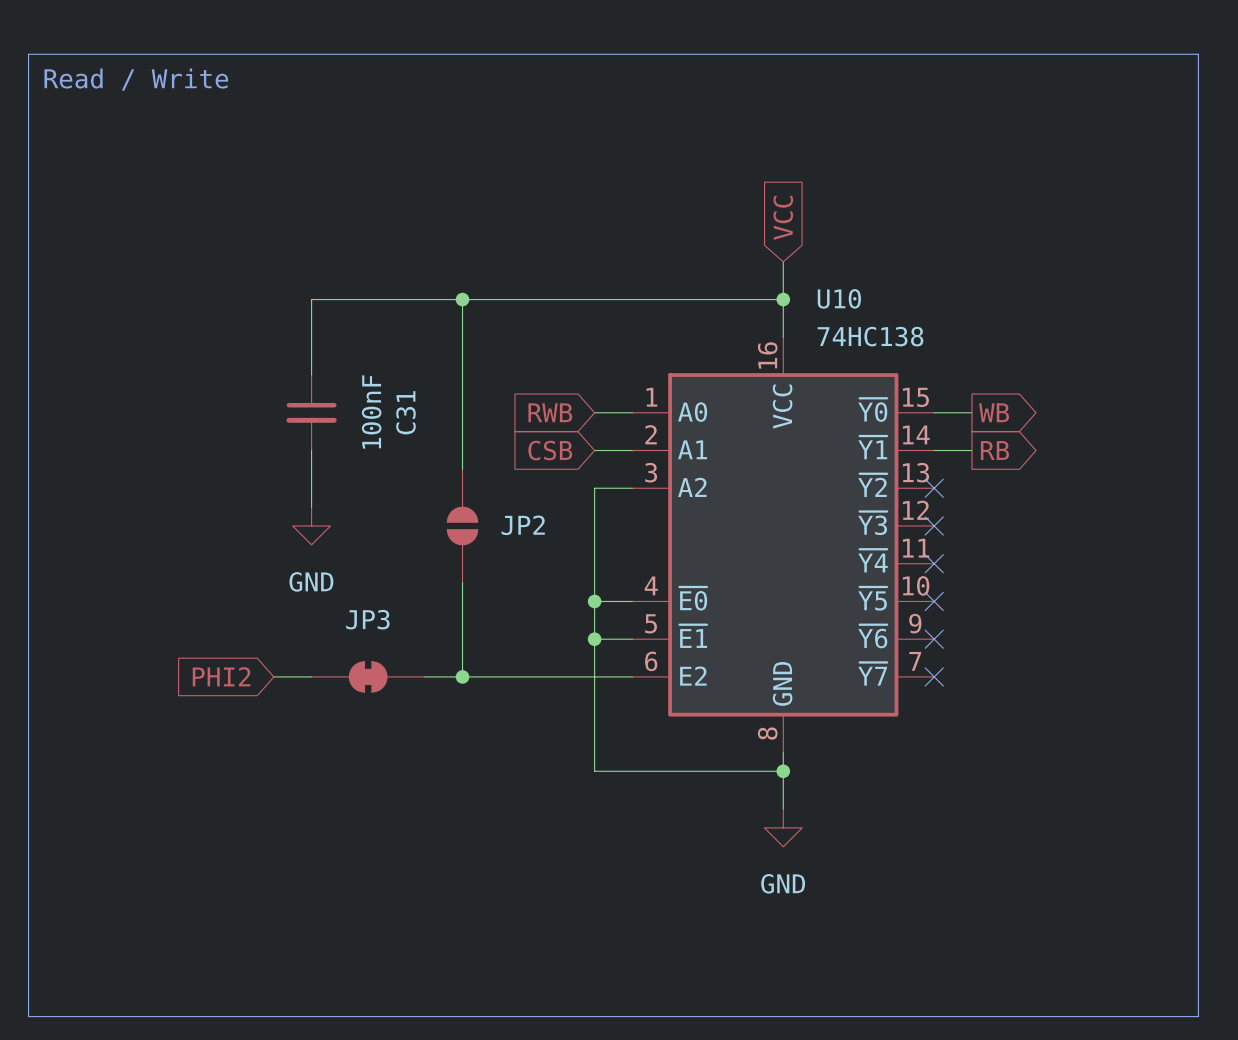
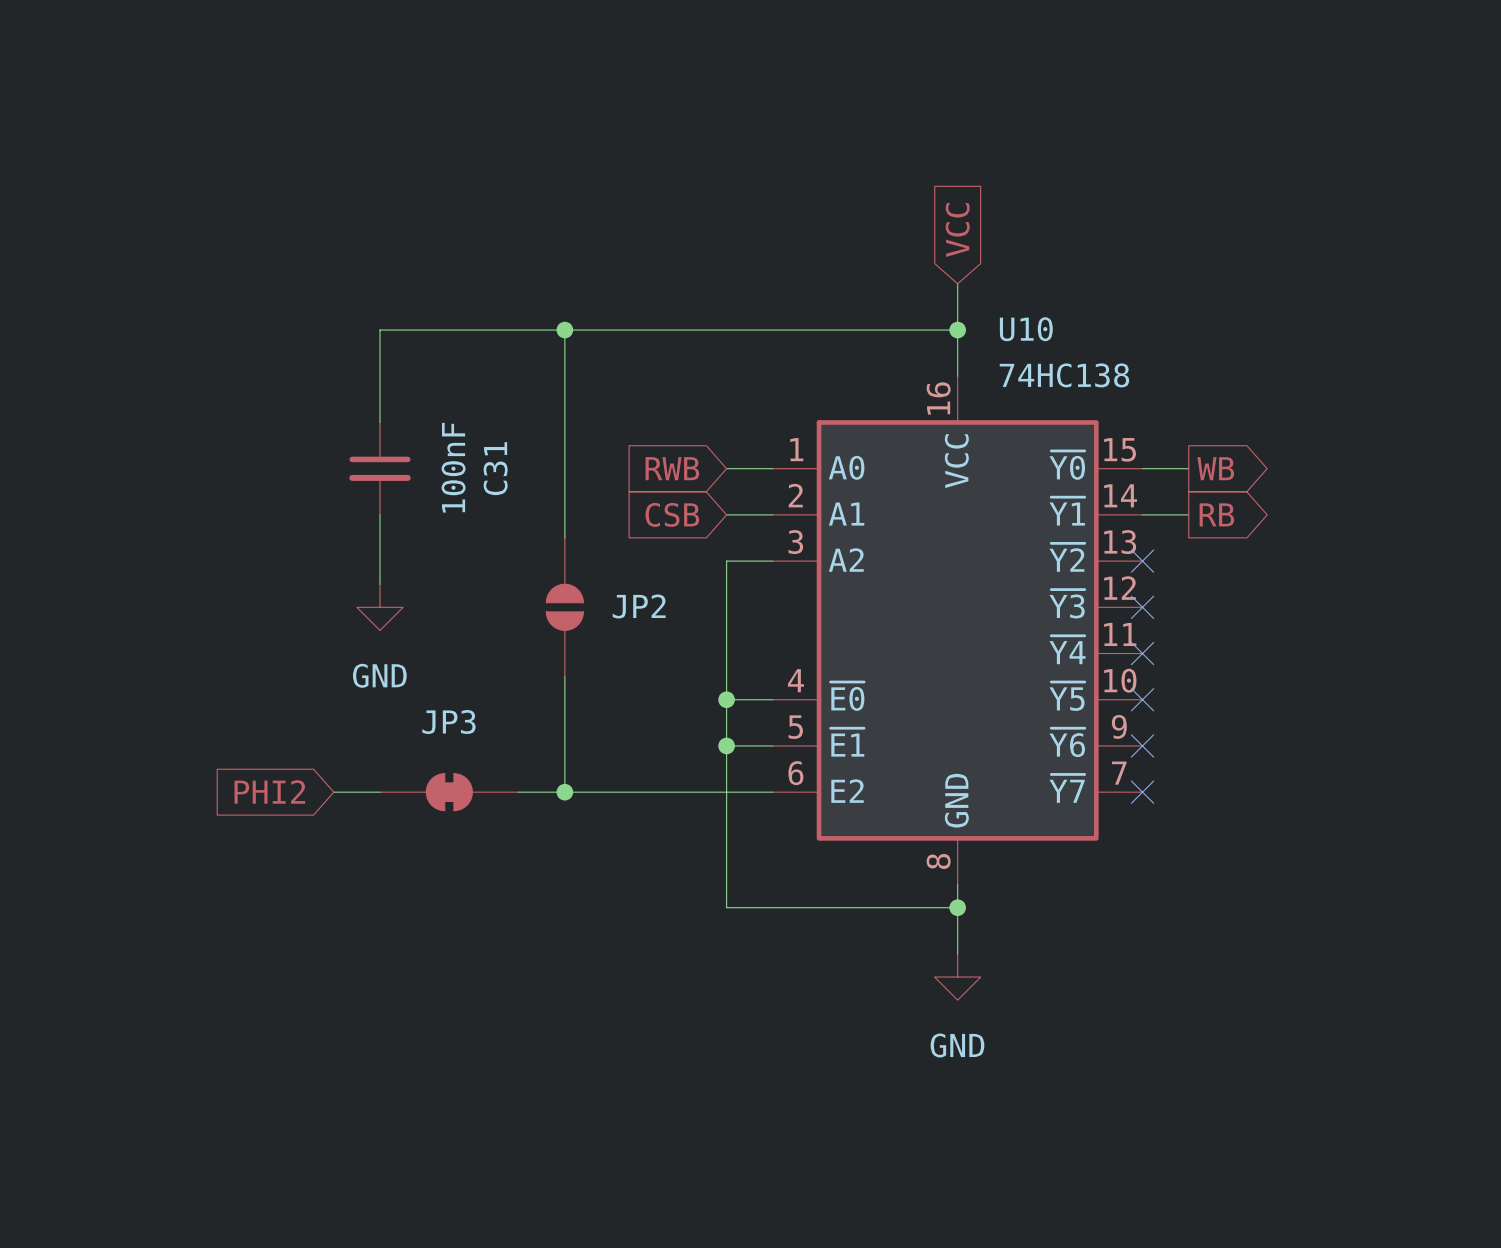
line: (28, 54) (1198, 54) (1198, 1016) (28, 1016) (28, 54) -> none
text: Read / Write (136, 79) -> none

